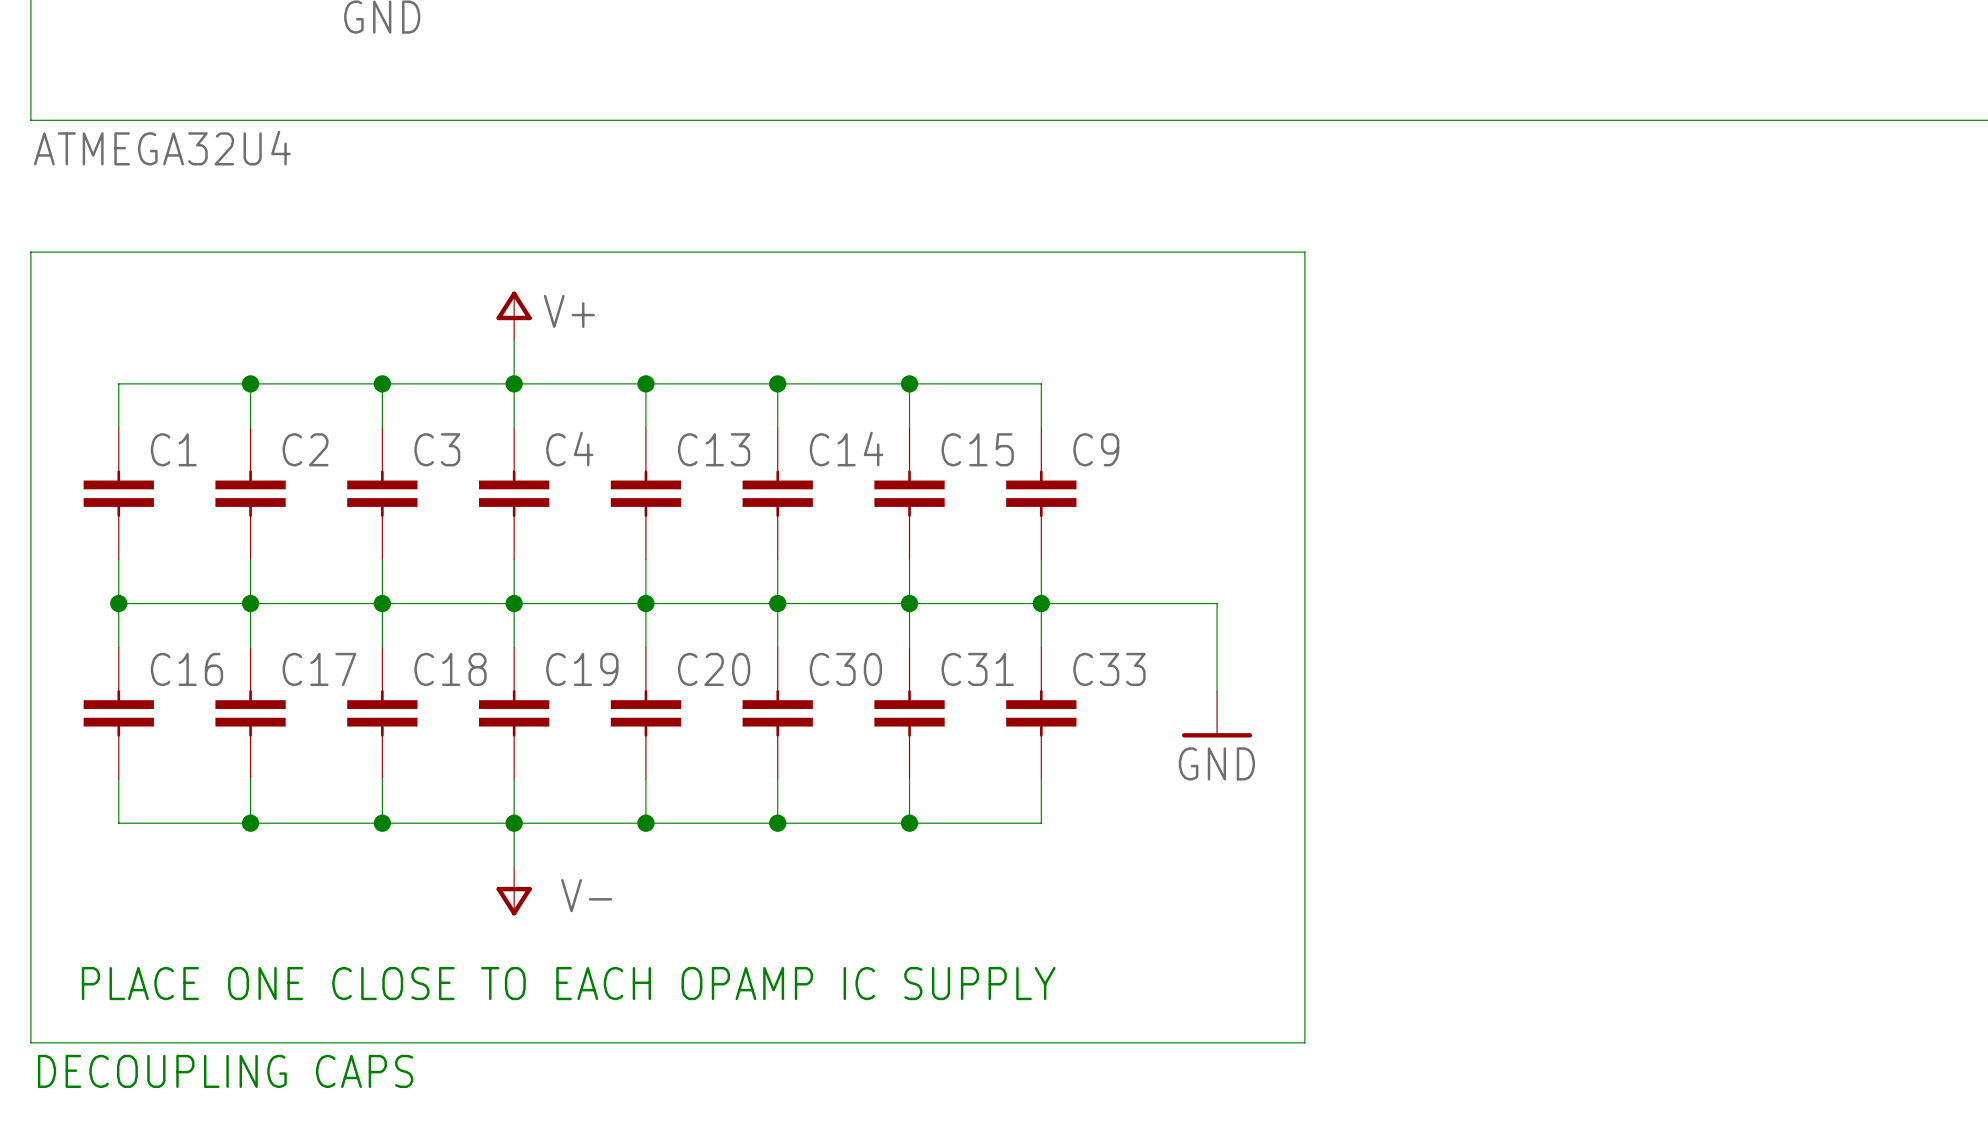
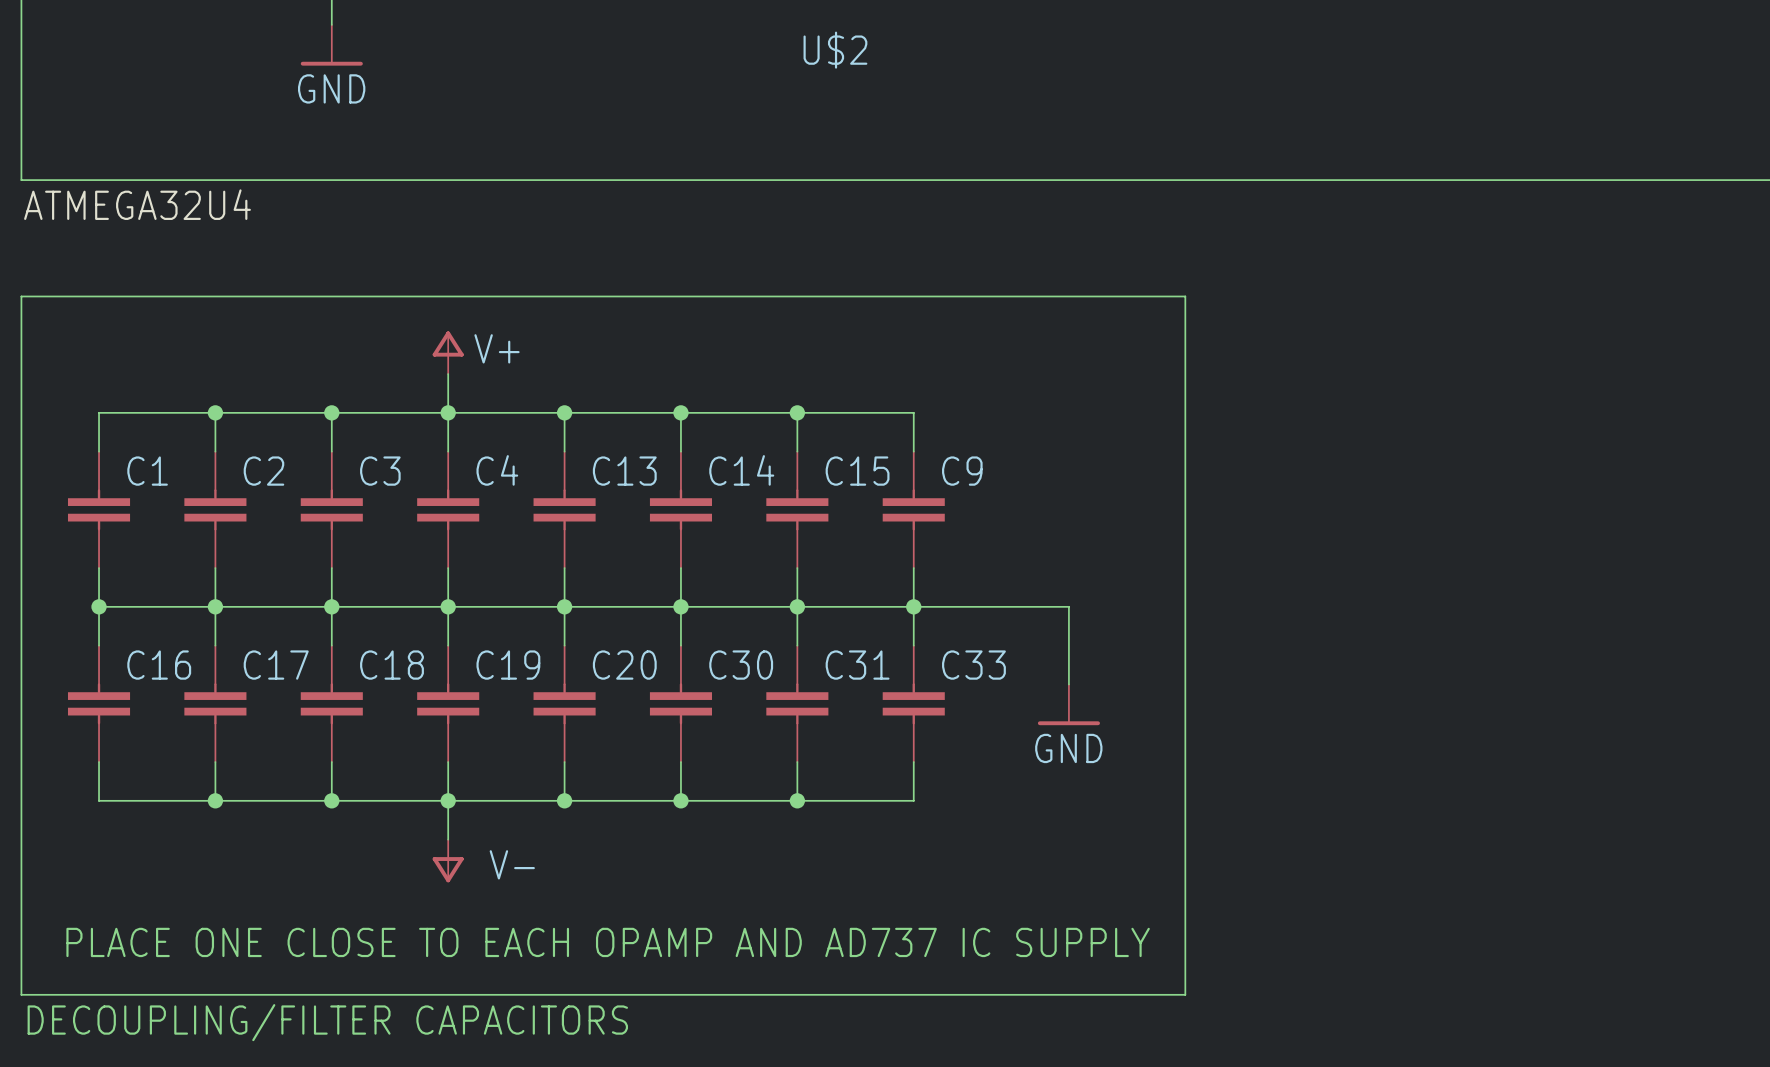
wire: (1304, 252) (1304, 1042) -> (1146, 296) (1185, 296) (1185, 994) (1146, 994)
text: PLACE ONE CLOSE TO EACH OPAMP IC SUPPLY (568, 983) -> PLACE ONE CLOSE TO EACH OPAMP AND AD737 IC SUPPLY (608, 942)
text: DECOUPLING CAPS (225, 1071) -> DECOUPLING/FILTER CAPACITORS (327, 1022)

